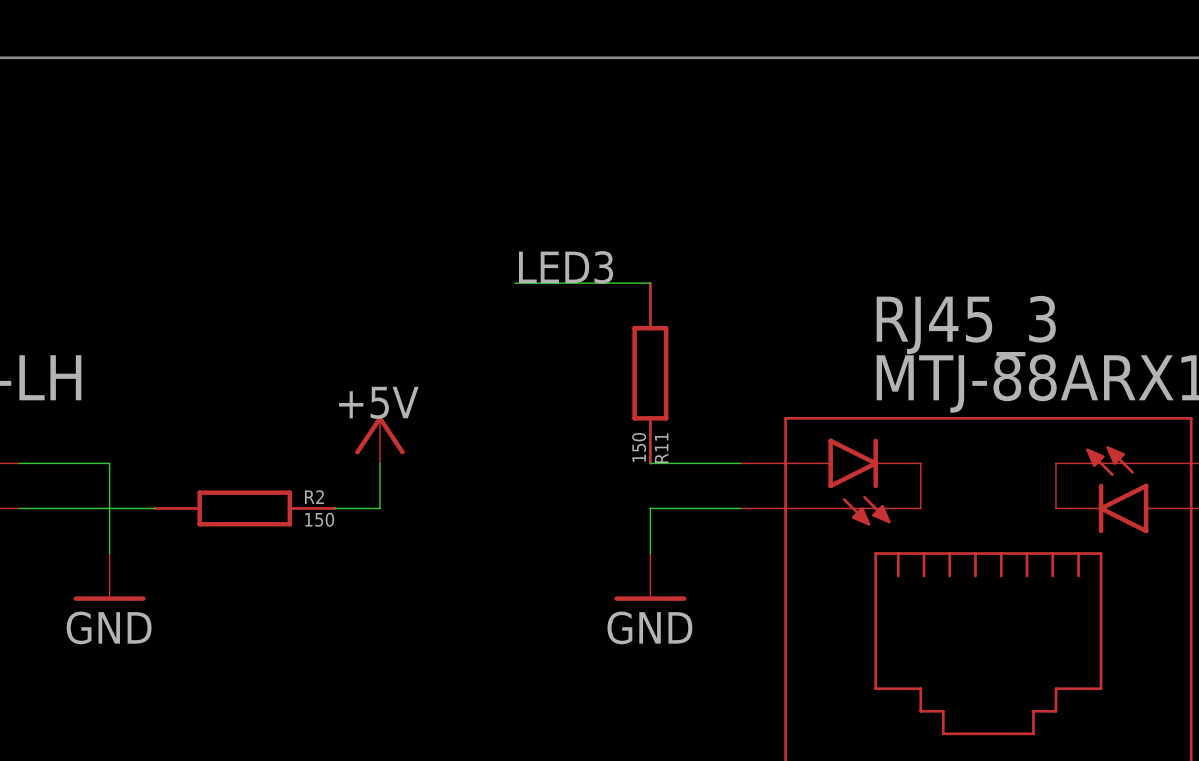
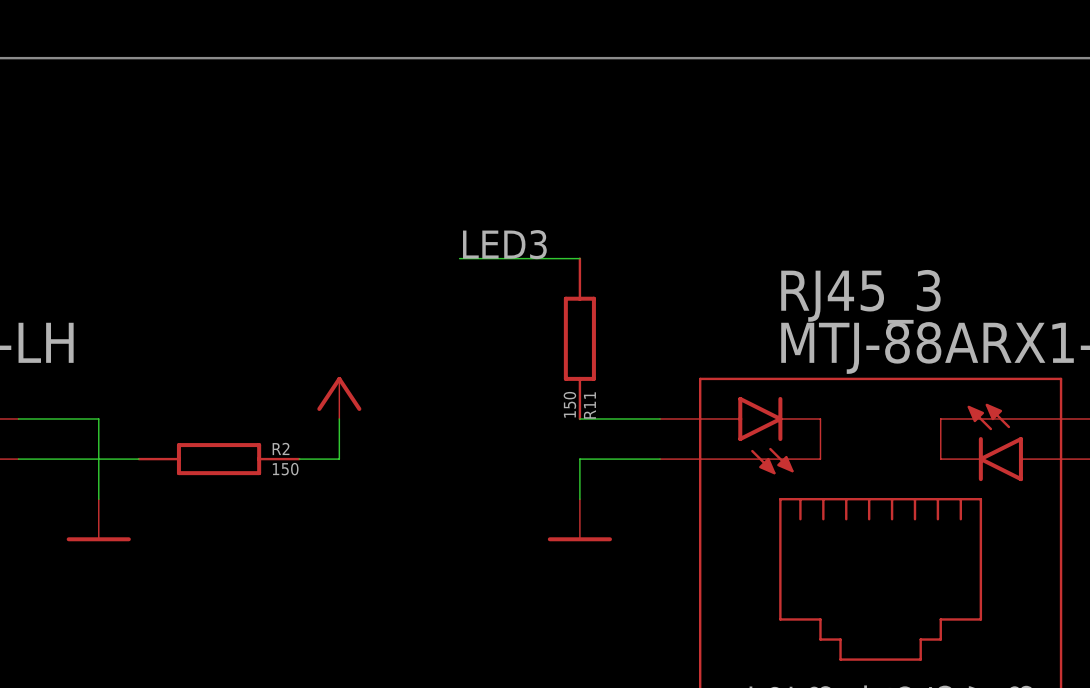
label: +5V (378, 402) -> none
label: GND (109, 627) -> none
label: GND (649, 627) -> none

